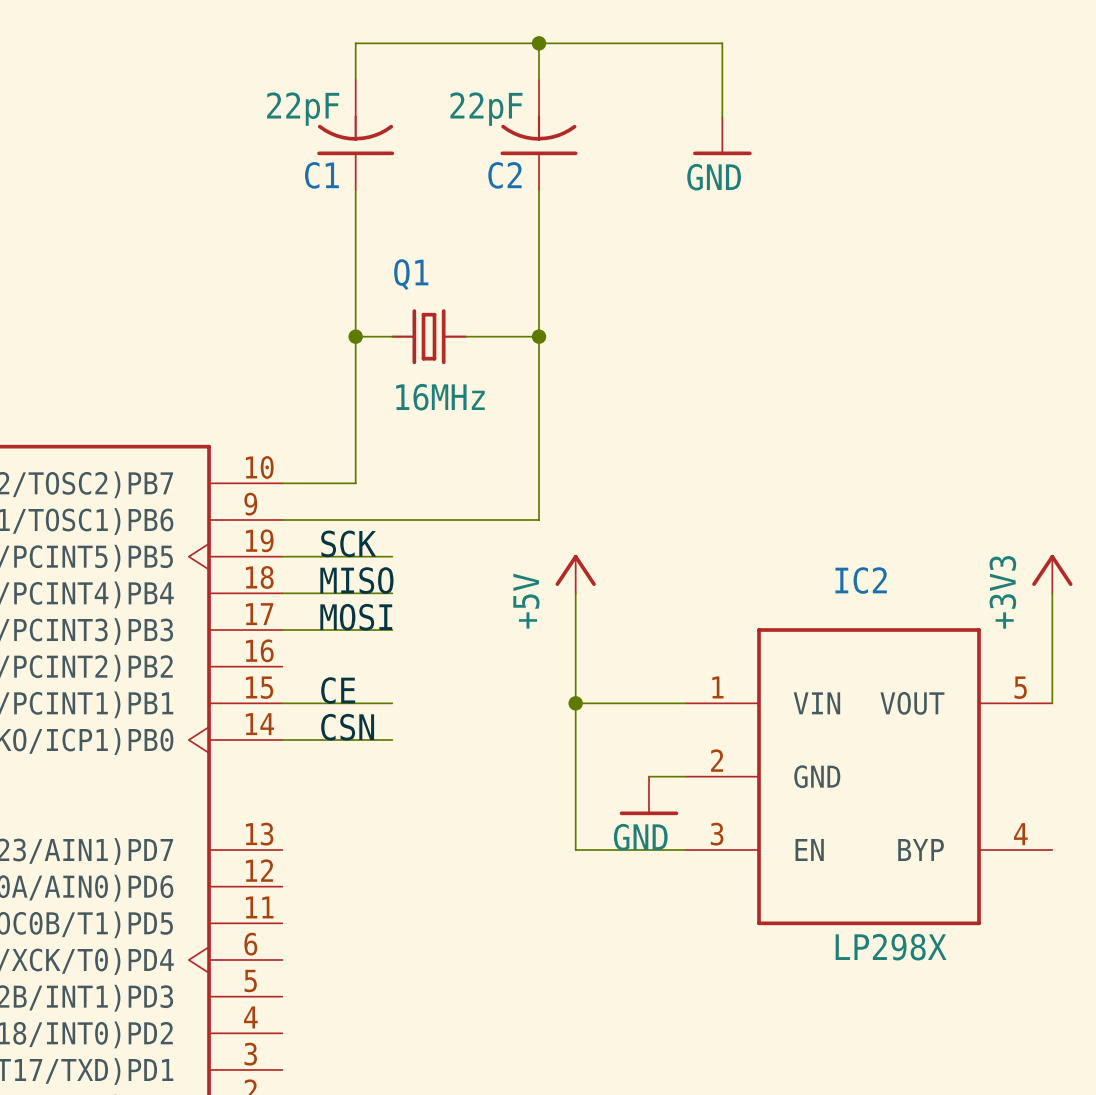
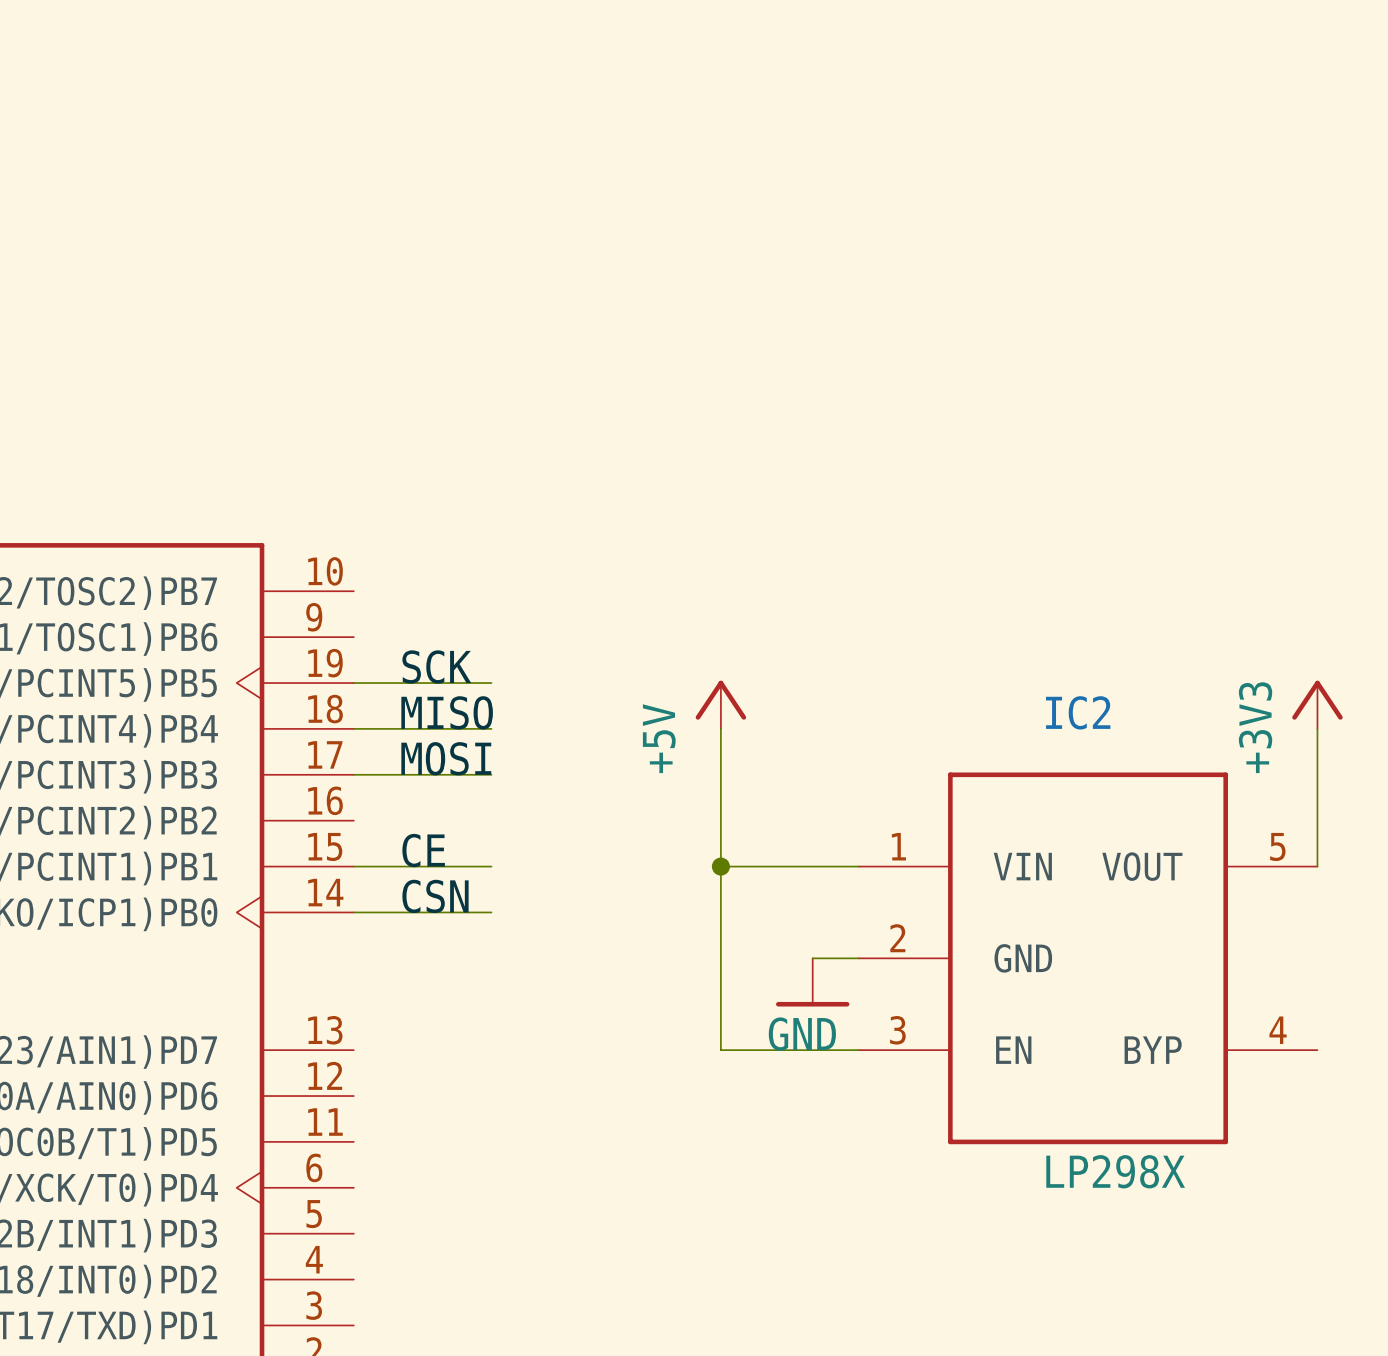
wire: (539, 43) (539, 80) -> none
junction: (539, 43) -> none
wire: (355, 80) (355, 43) (722, 43) (722, 116) -> none
C1: 22pF (355, 135) -> none
C2: 22pF (539, 135) -> none
power symbol: GND (722, 135) -> none
wire: (355, 190) (355, 483) (282, 483) -> none
wire: (539, 190) (539, 520) (282, 520) -> none
wire: (355, 336) (392, 336) -> none
junction: (355, 336) -> none
Q1: 16MHz (429, 336) -> none
wire: (465, 336) (539, 336) -> none
junction: (539, 336) -> none

